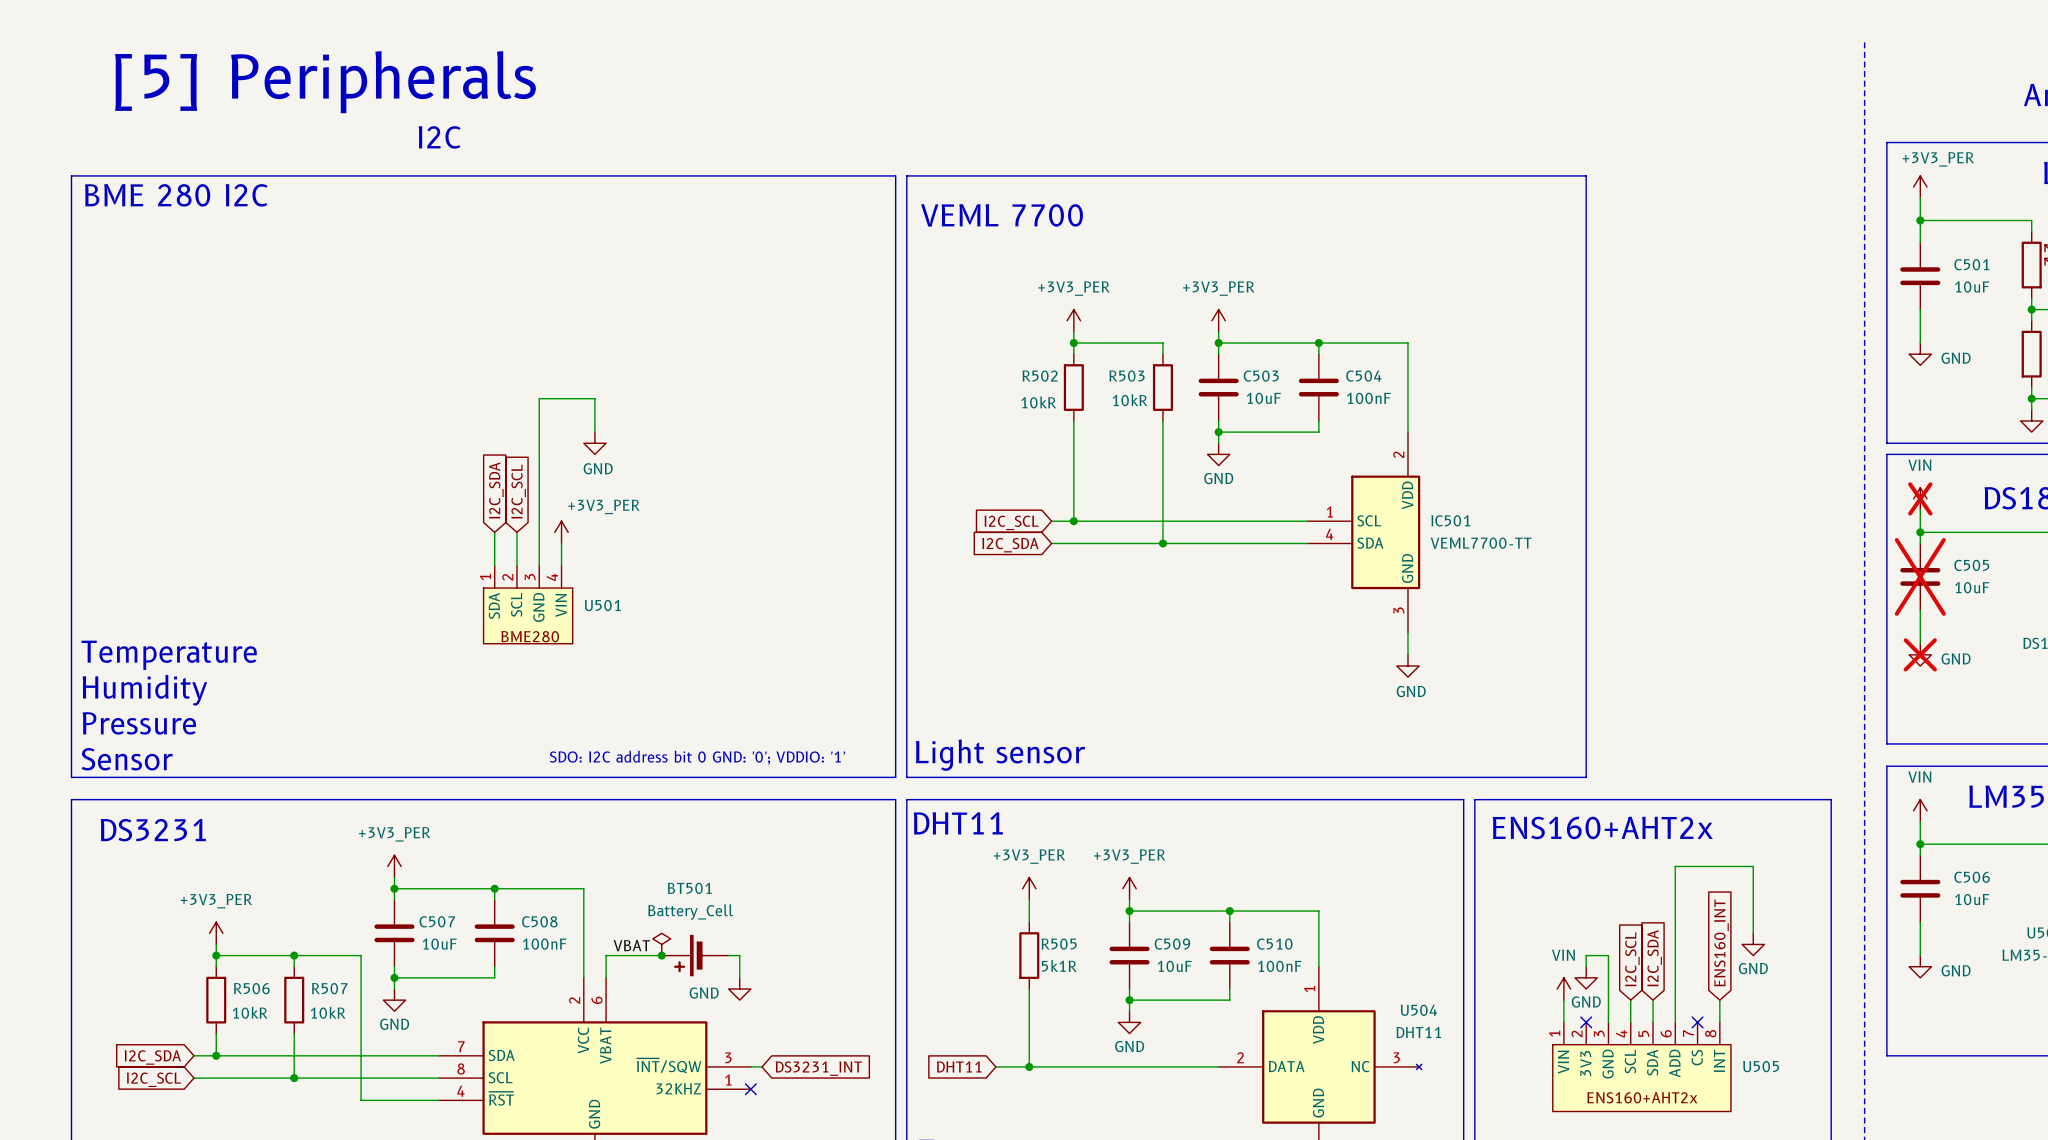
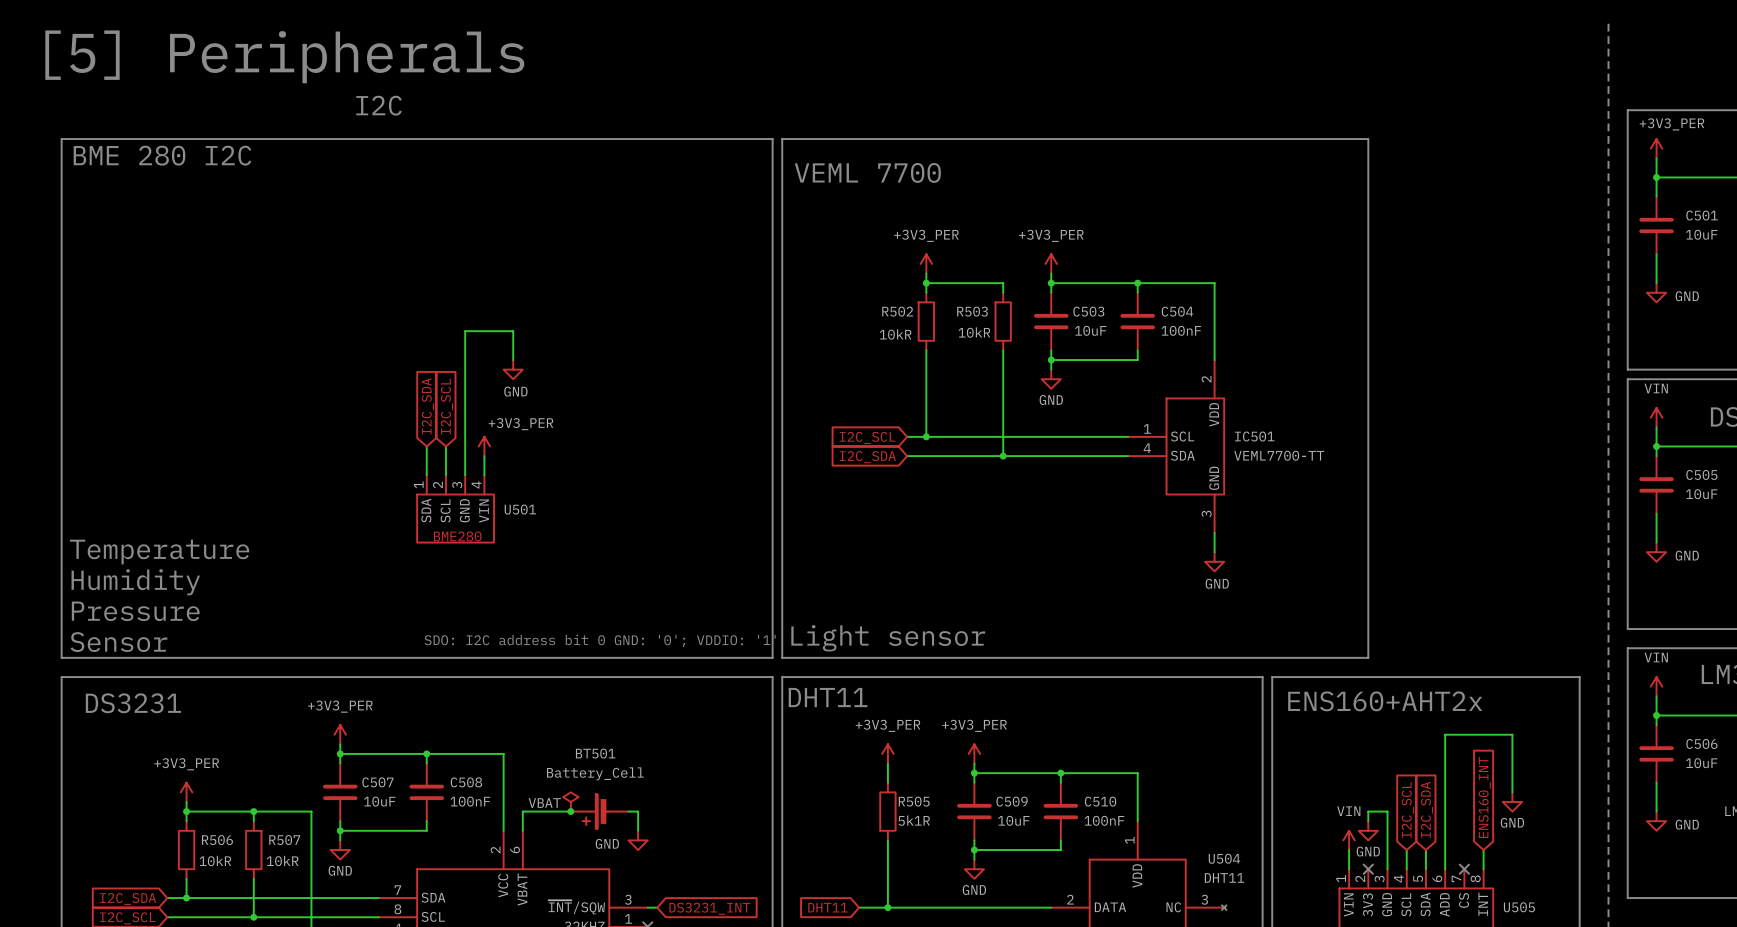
power symbol do-not-place cross: (1920, 498) -> none
C505 do-not-place cross: (1920, 576) -> none
power symbol do-not-place cross: (1920, 654) -> none

